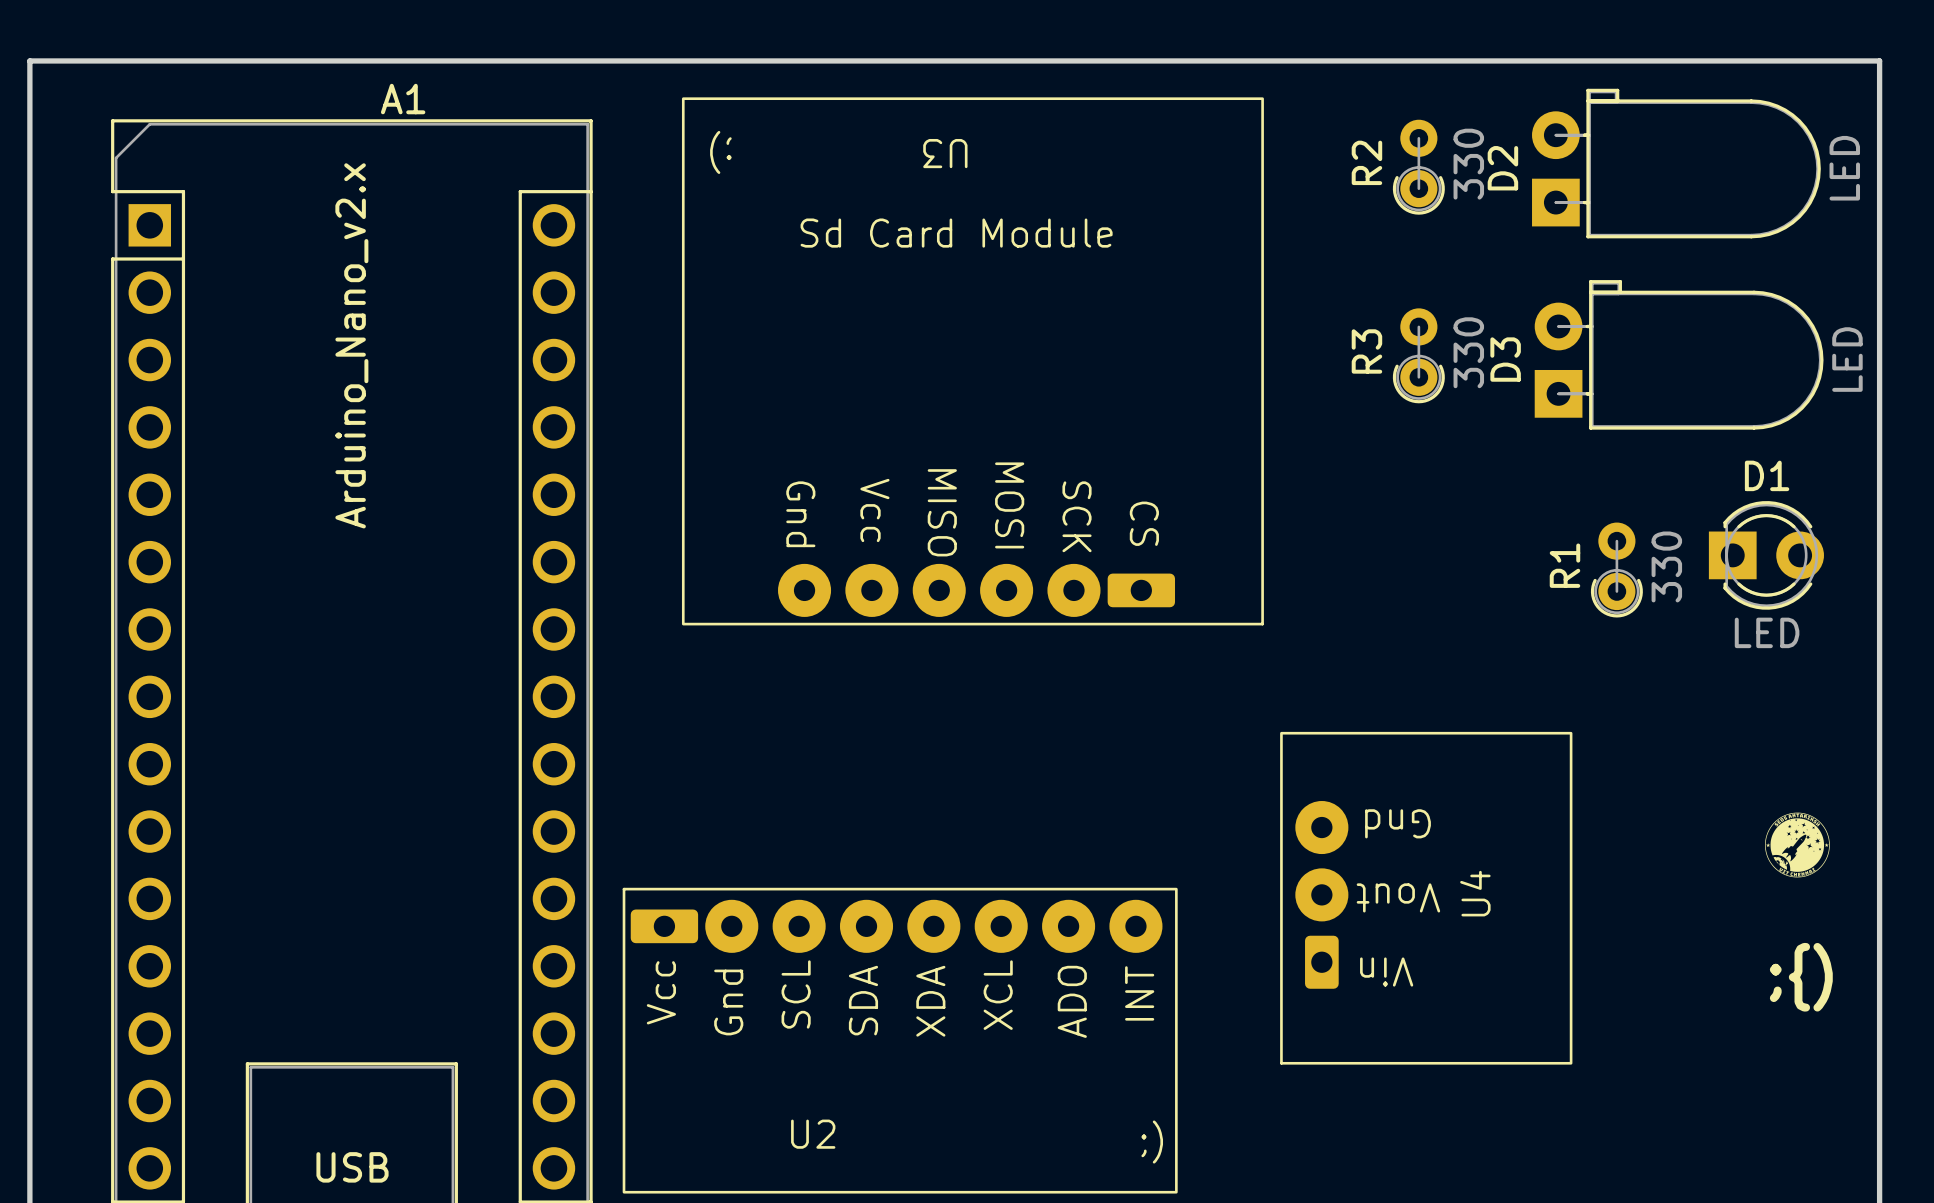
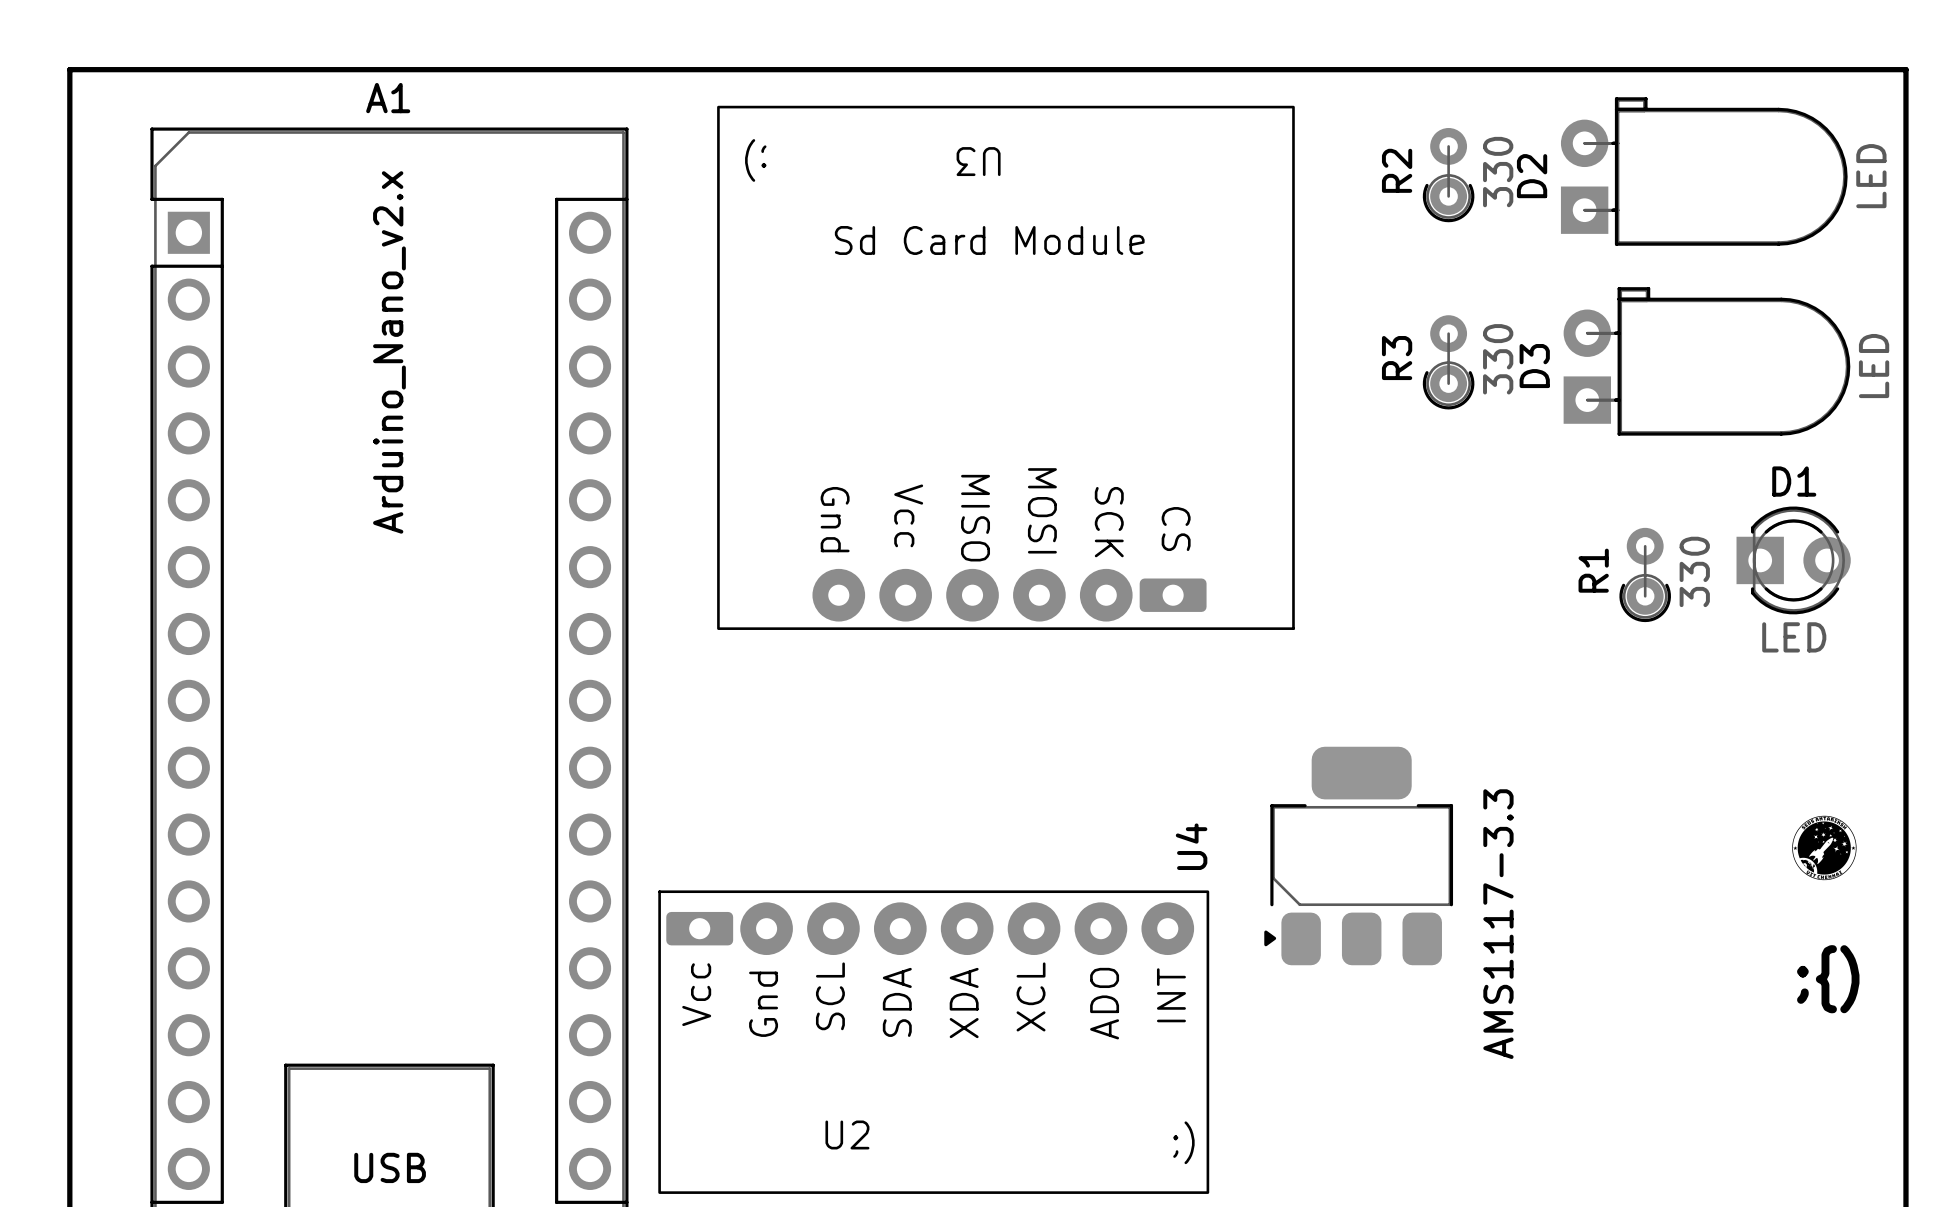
A1 name position: A1 (403, 99) -> A1 (388, 98)
U4 footprint: [1280, 731, 1573, 1065] -> [1264, 746, 1454, 966]
U4 name position: U4 (1475, 893) -> U4 (1191, 846)
U4 value: none -> AMS1117-3.3 (1498, 924)

